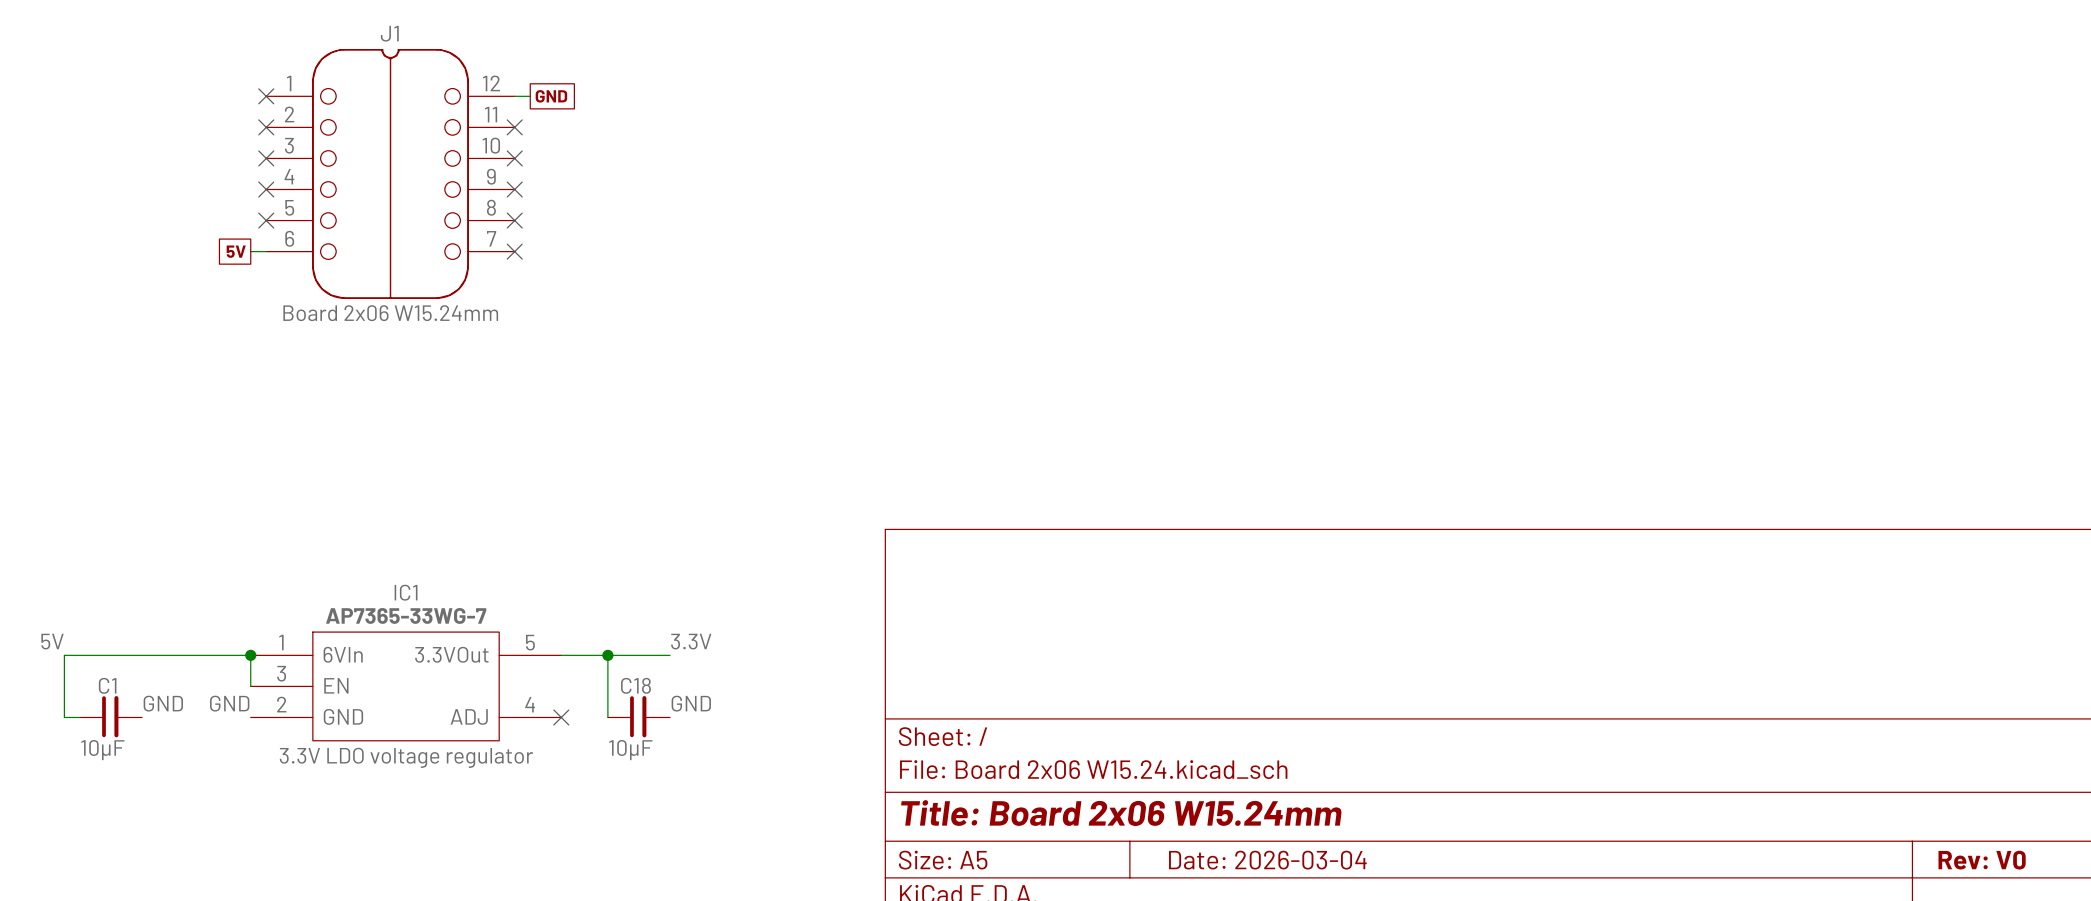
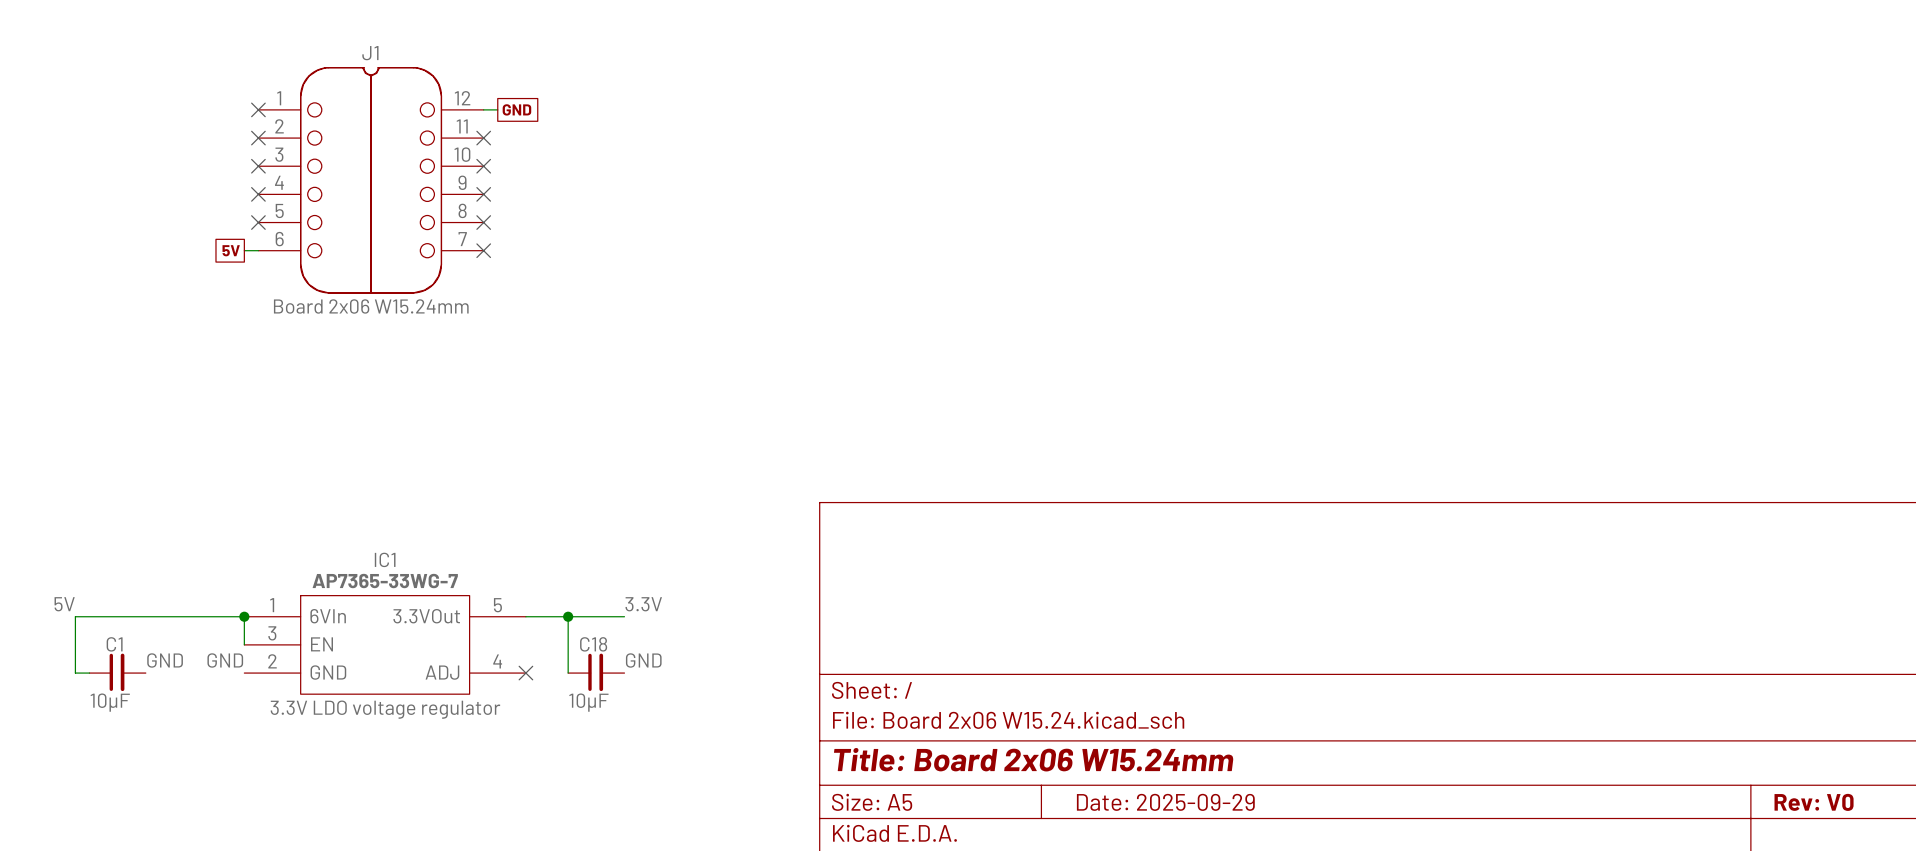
title block: Date: 2026-03-04 (1267, 860) -> Date: 2025-09-29 (1165, 802)

